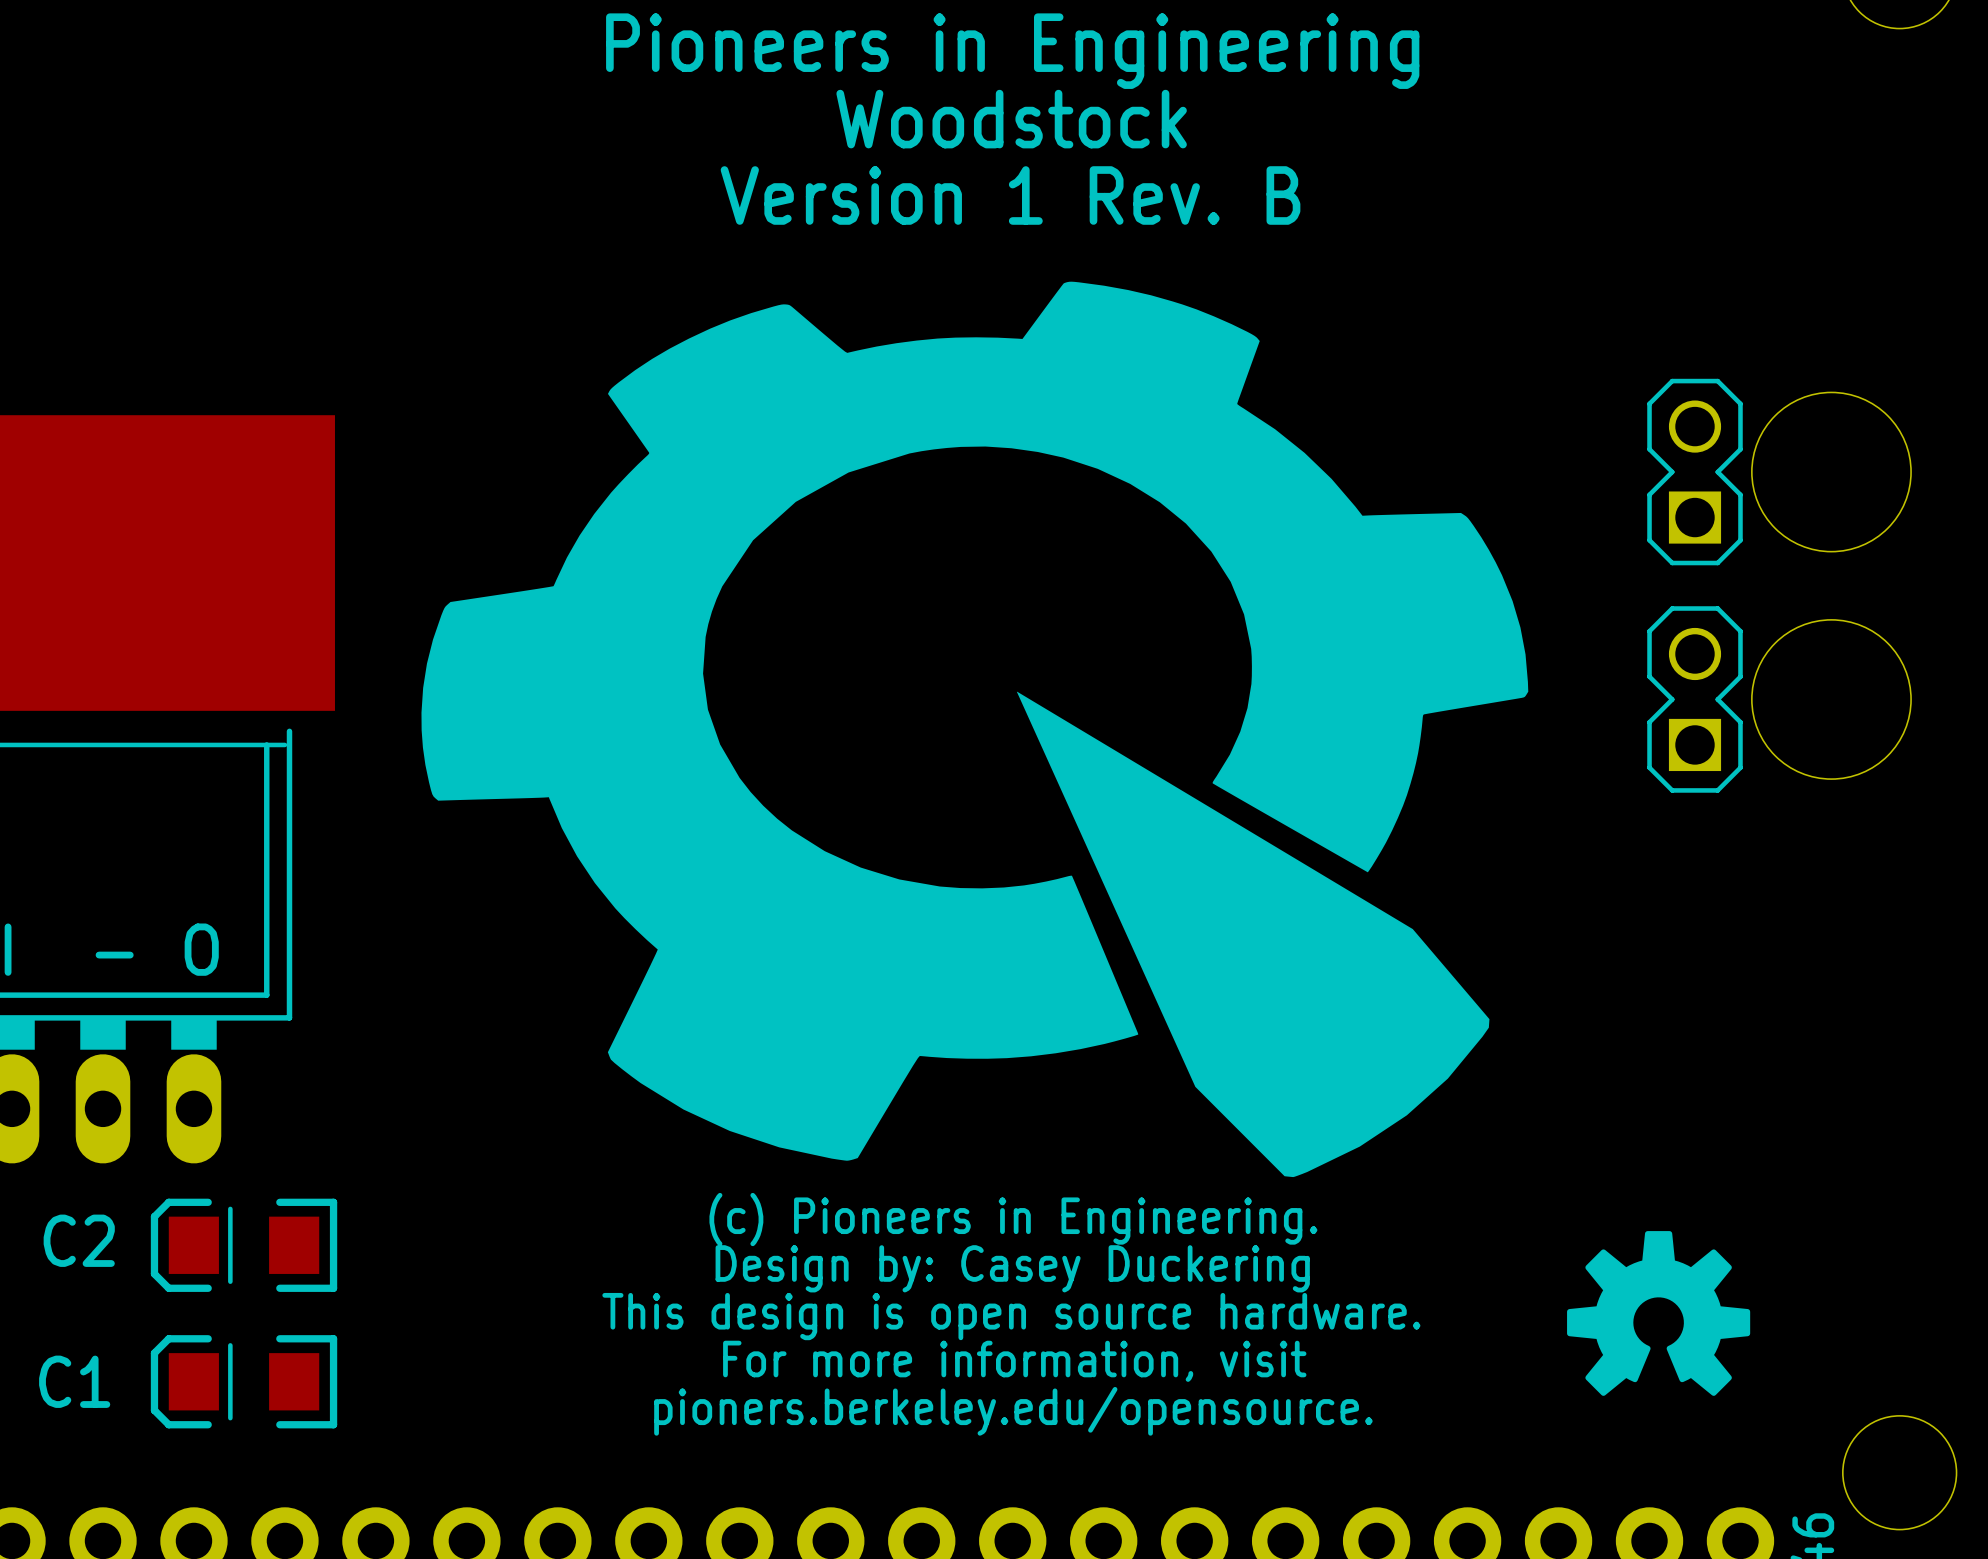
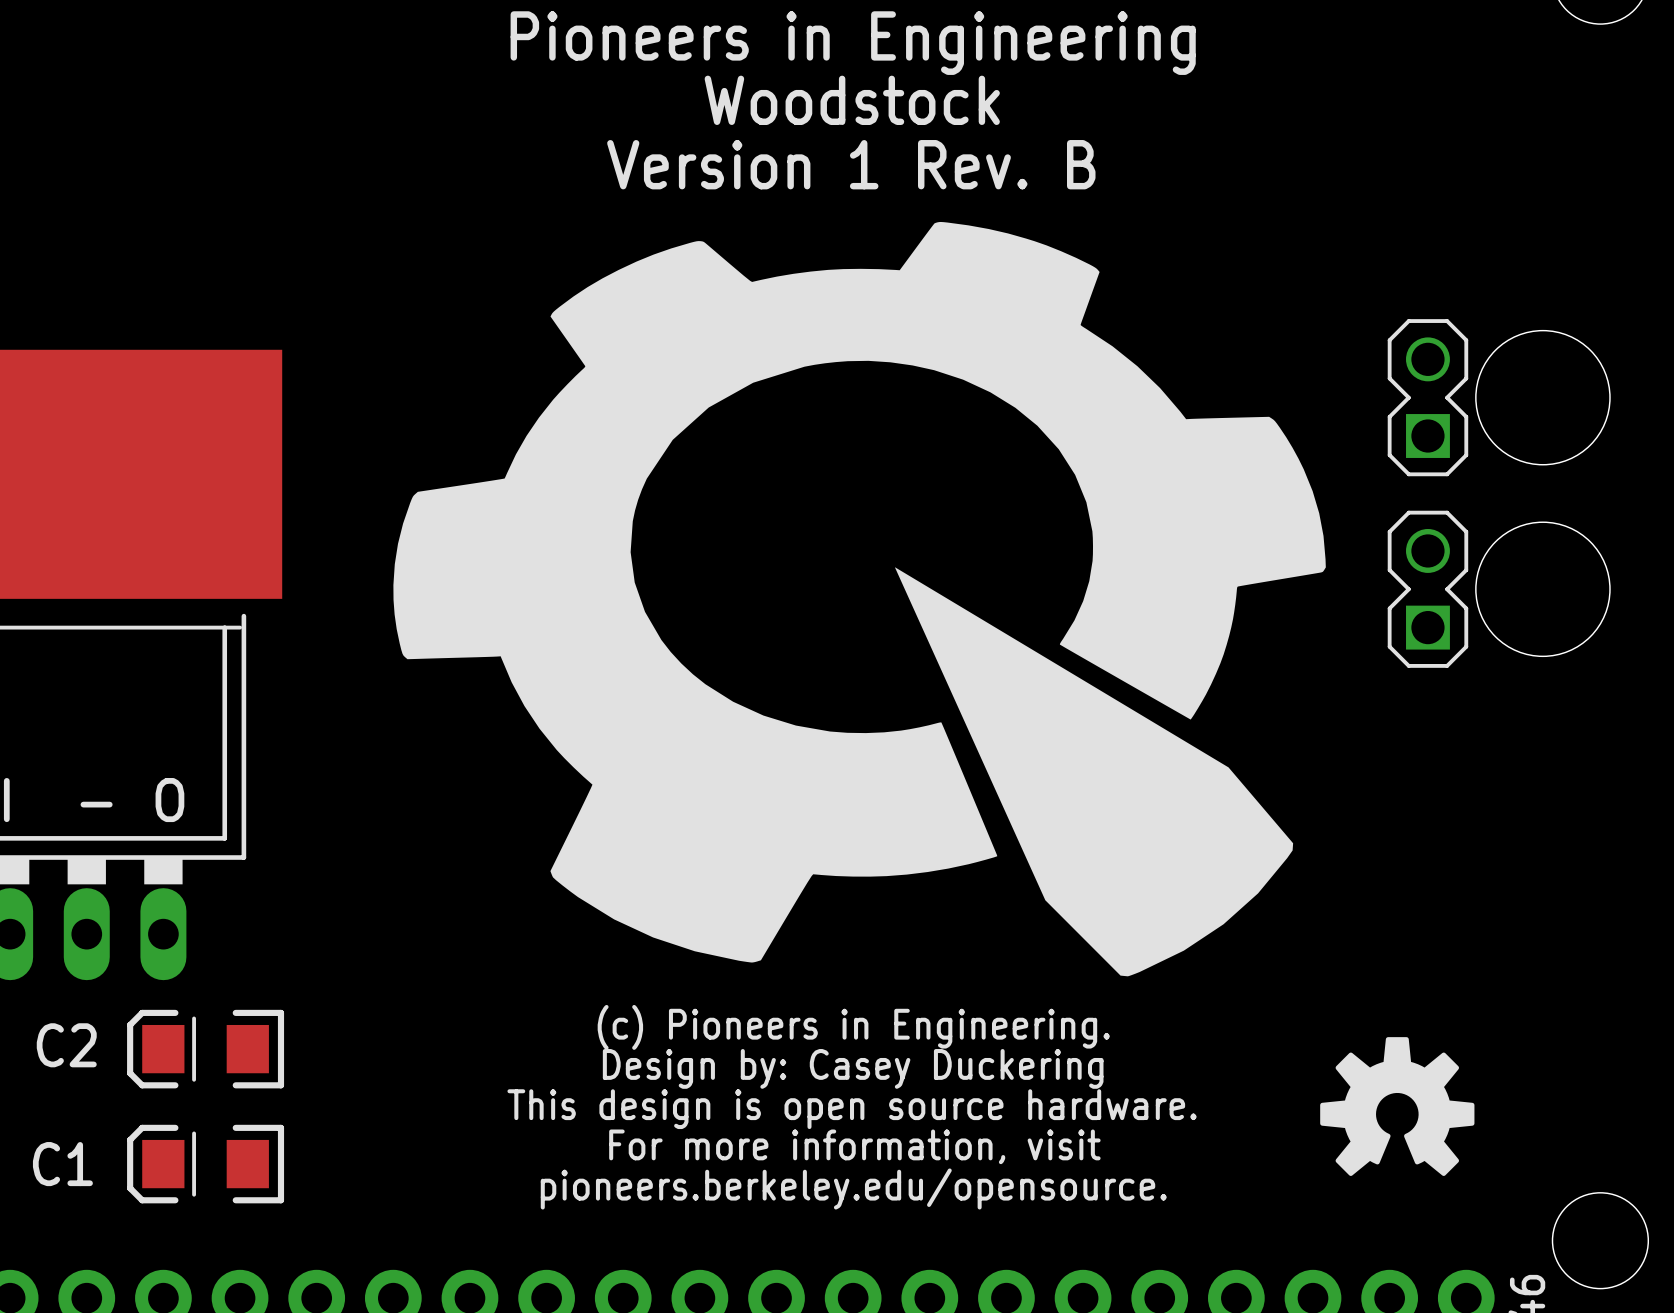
drawing position: (974, 729) -> (859, 599)
text: pioners.berkeley.edu/opensource. (1013, 1411) -> pioneers.berkeley.edu/opensource. (853, 1188)

